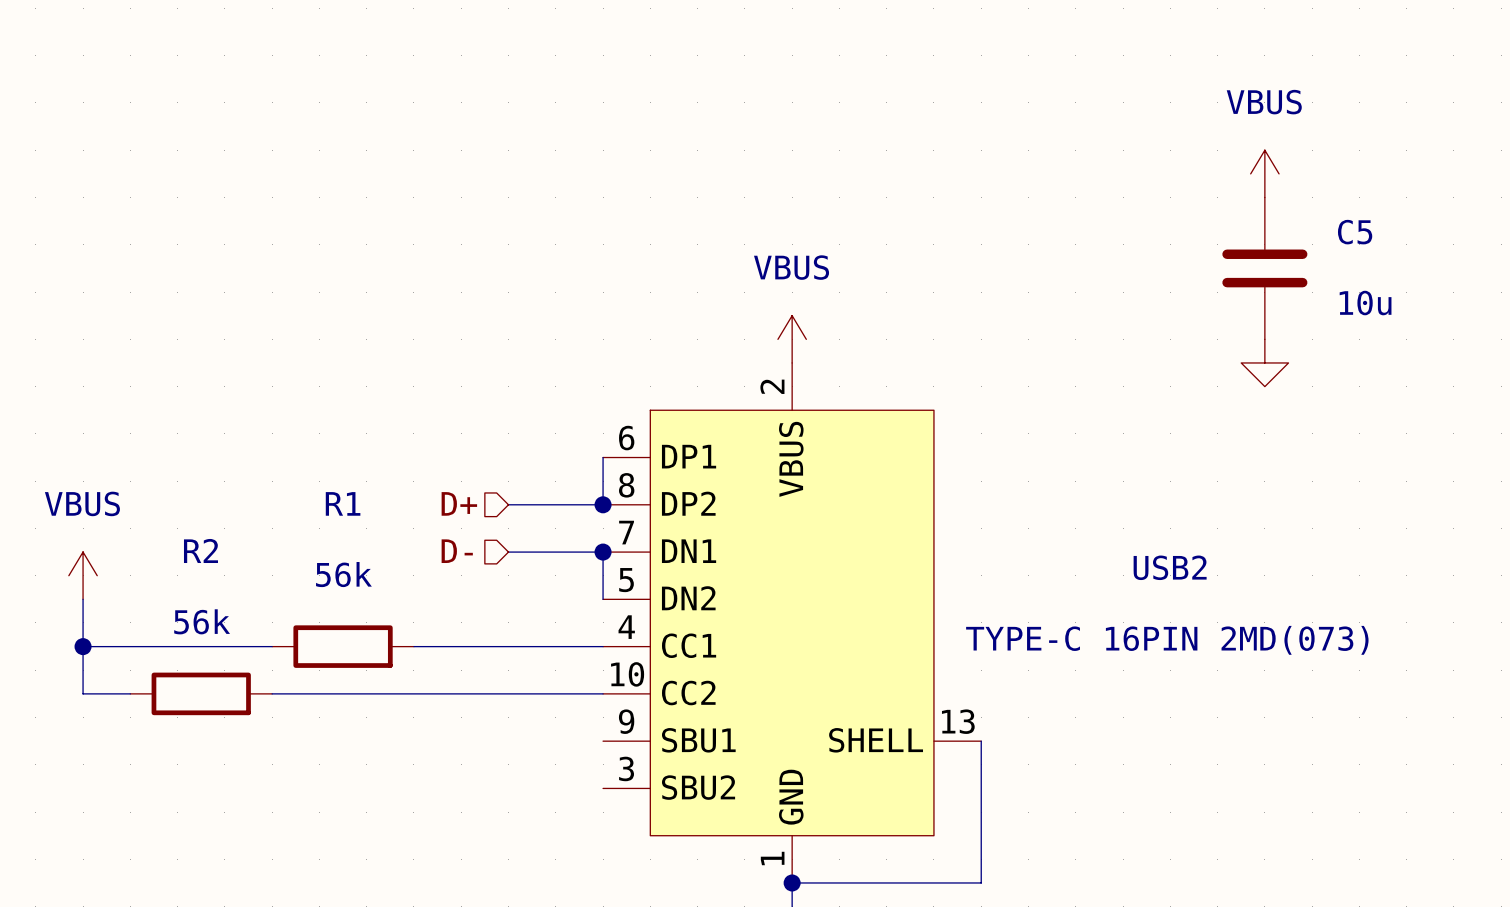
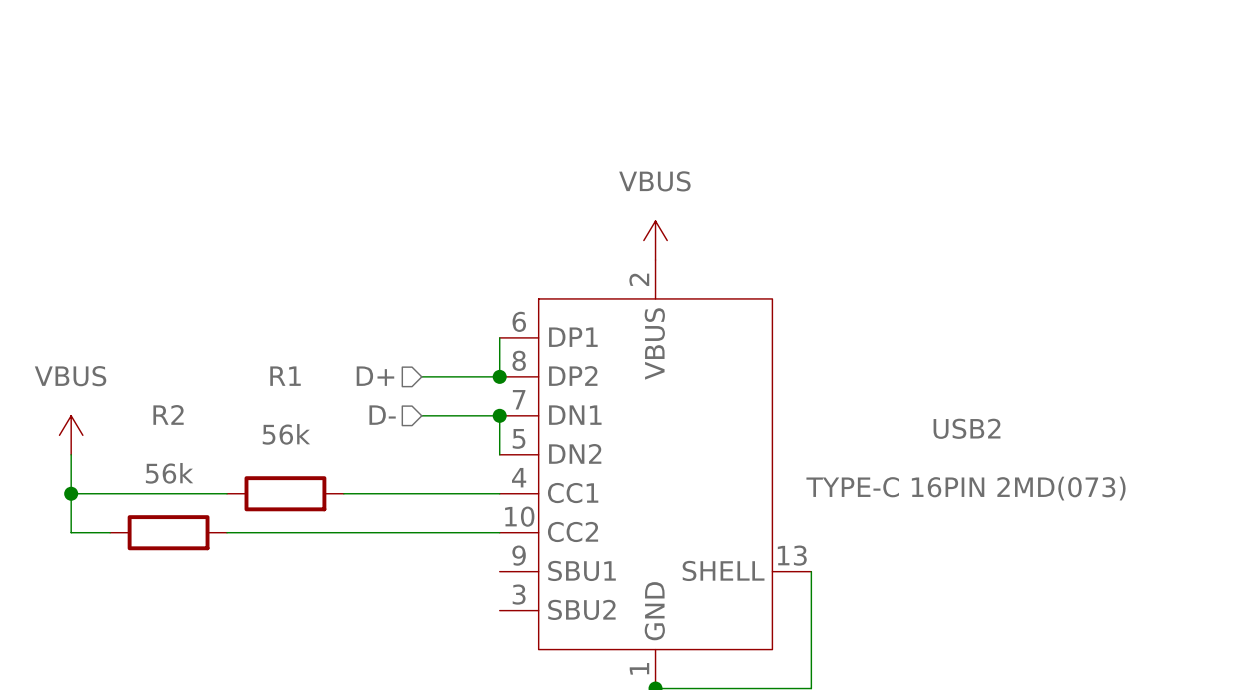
power symbol: VBUS (1264, 173) -> none
C5: 10u (1264, 268) -> none
power symbol: (1264, 362) -> none

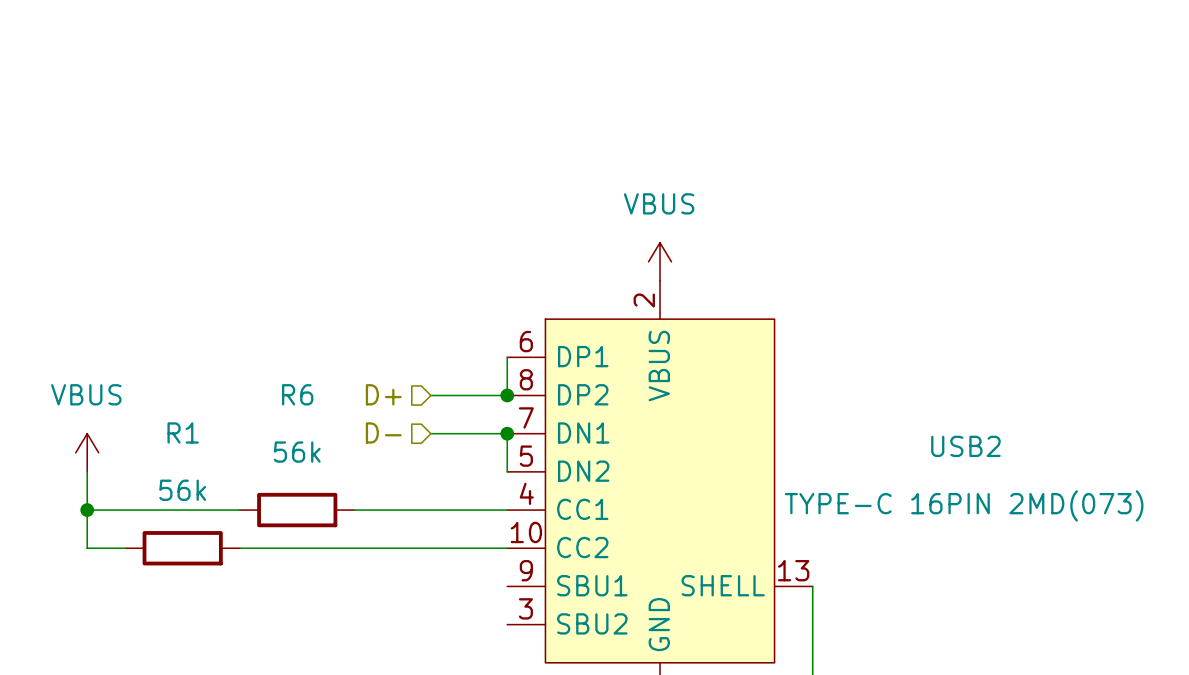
R1 name: R1 (285, 376) -> R6 (297, 394)
R2 name: R2 (168, 414) -> R1 (183, 432)

